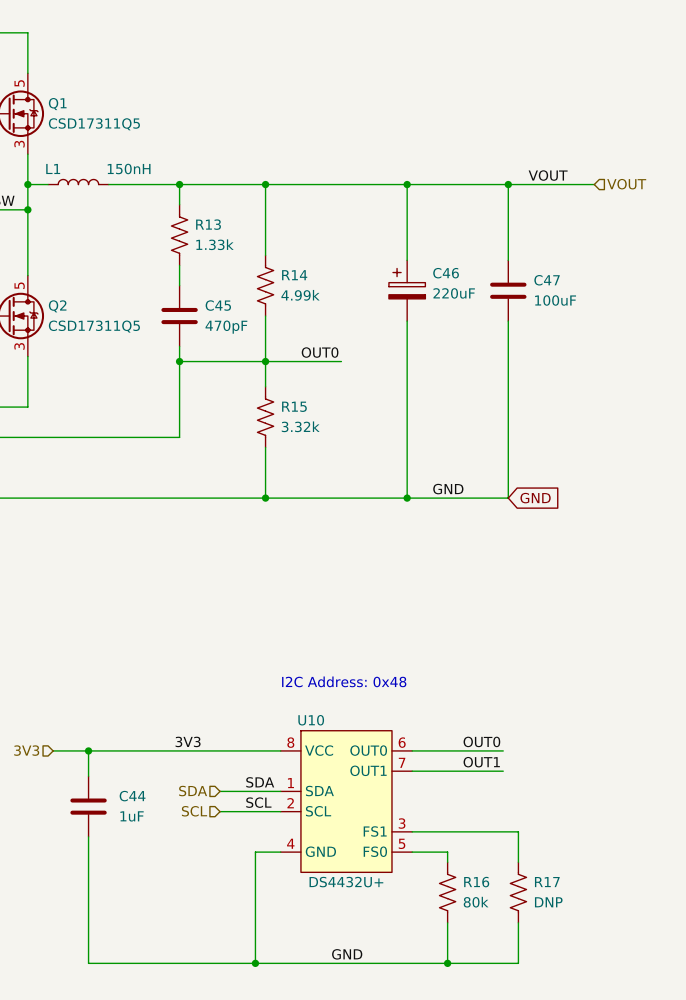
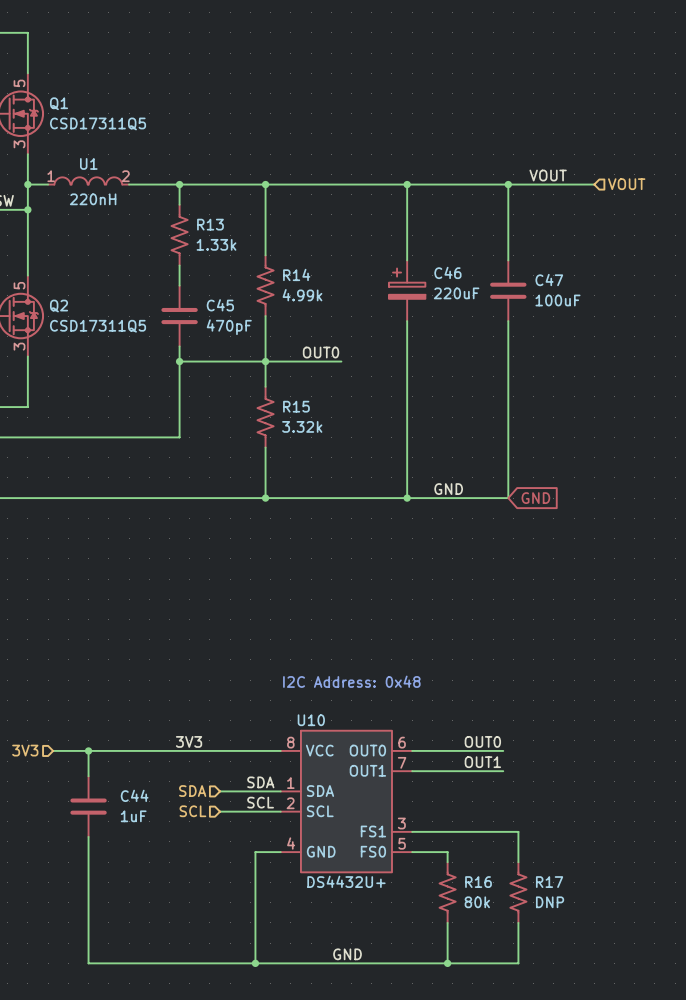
U1: none -> 220nH (88, 181)
L1: 150nH (78, 182) -> none
wire: (108, 184) (129, 184) -> none

